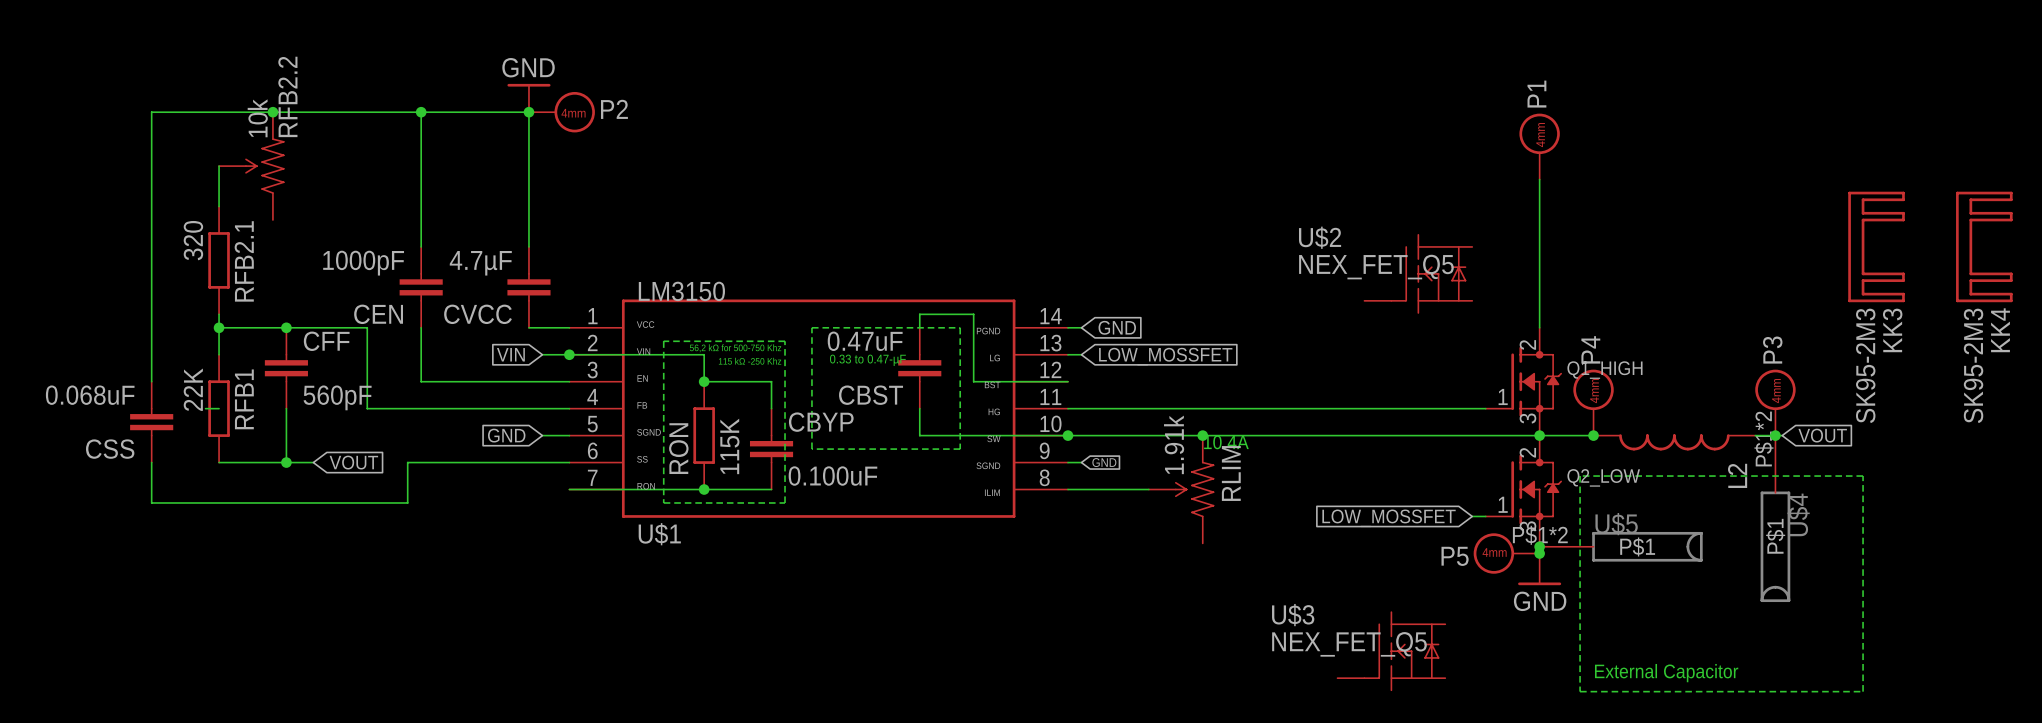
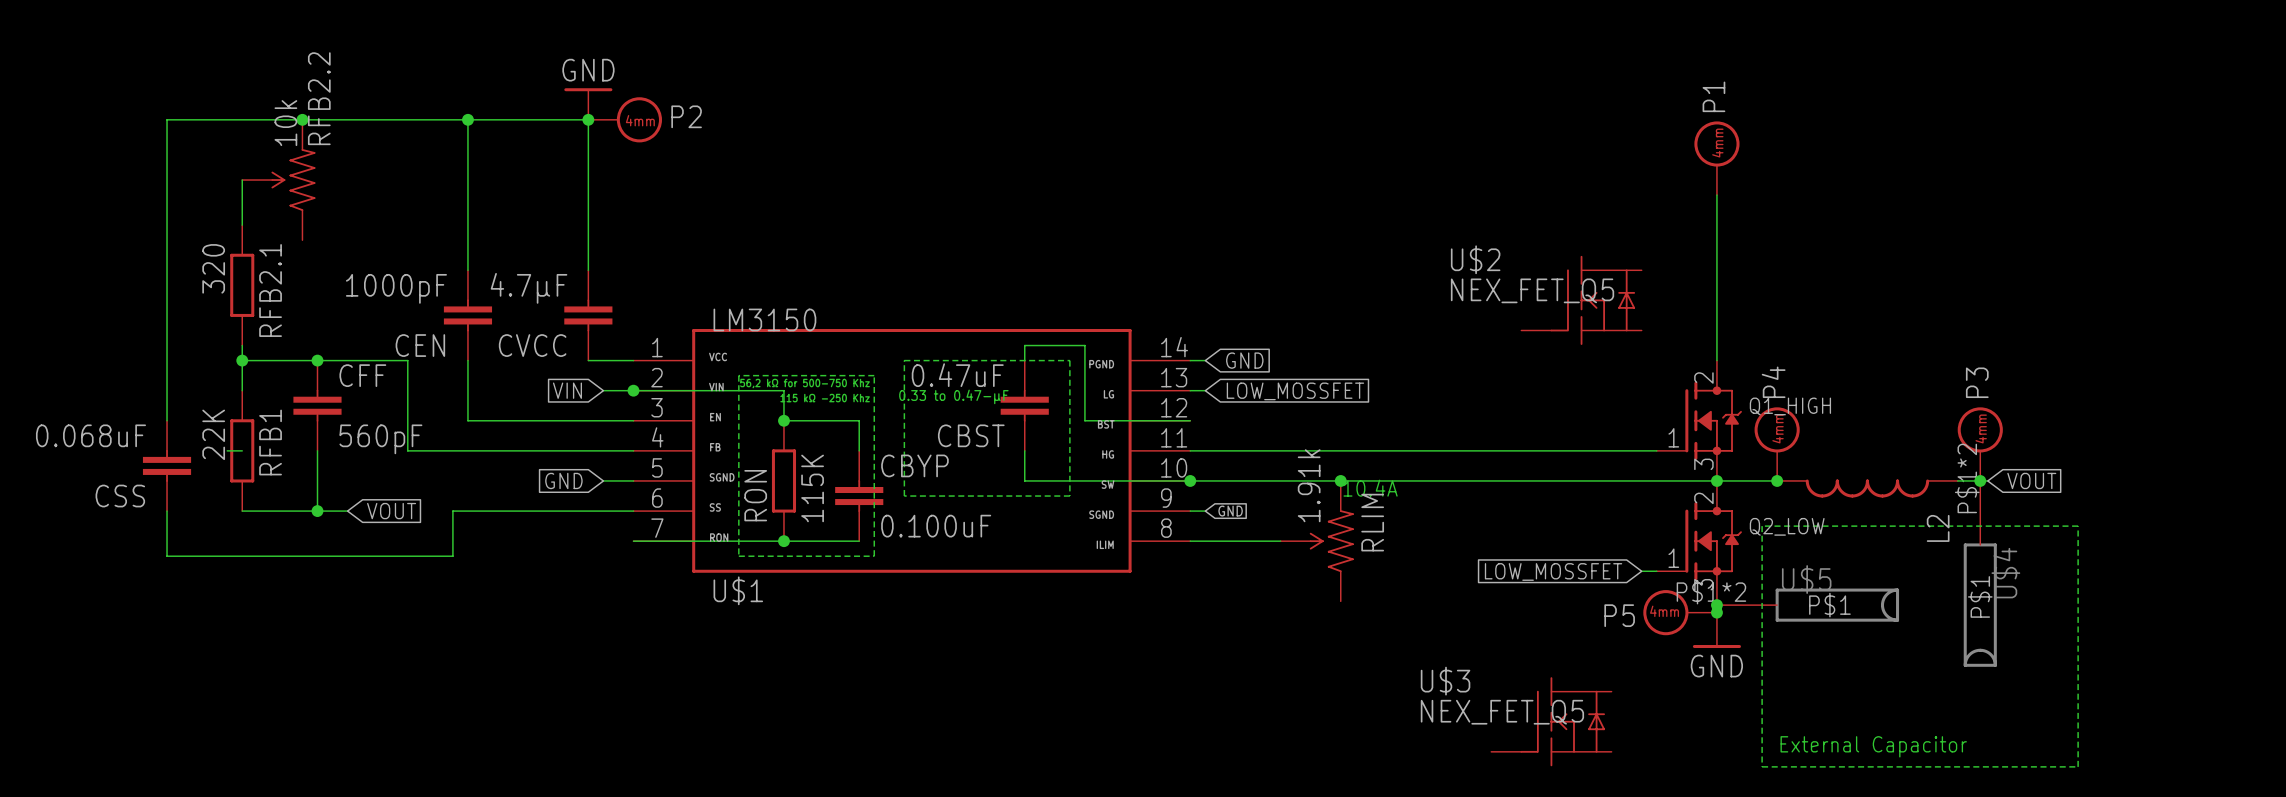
KK3: SK95-2M3 (1876, 246) -> none
KK4: SK95-2M3 (1984, 246) -> none

